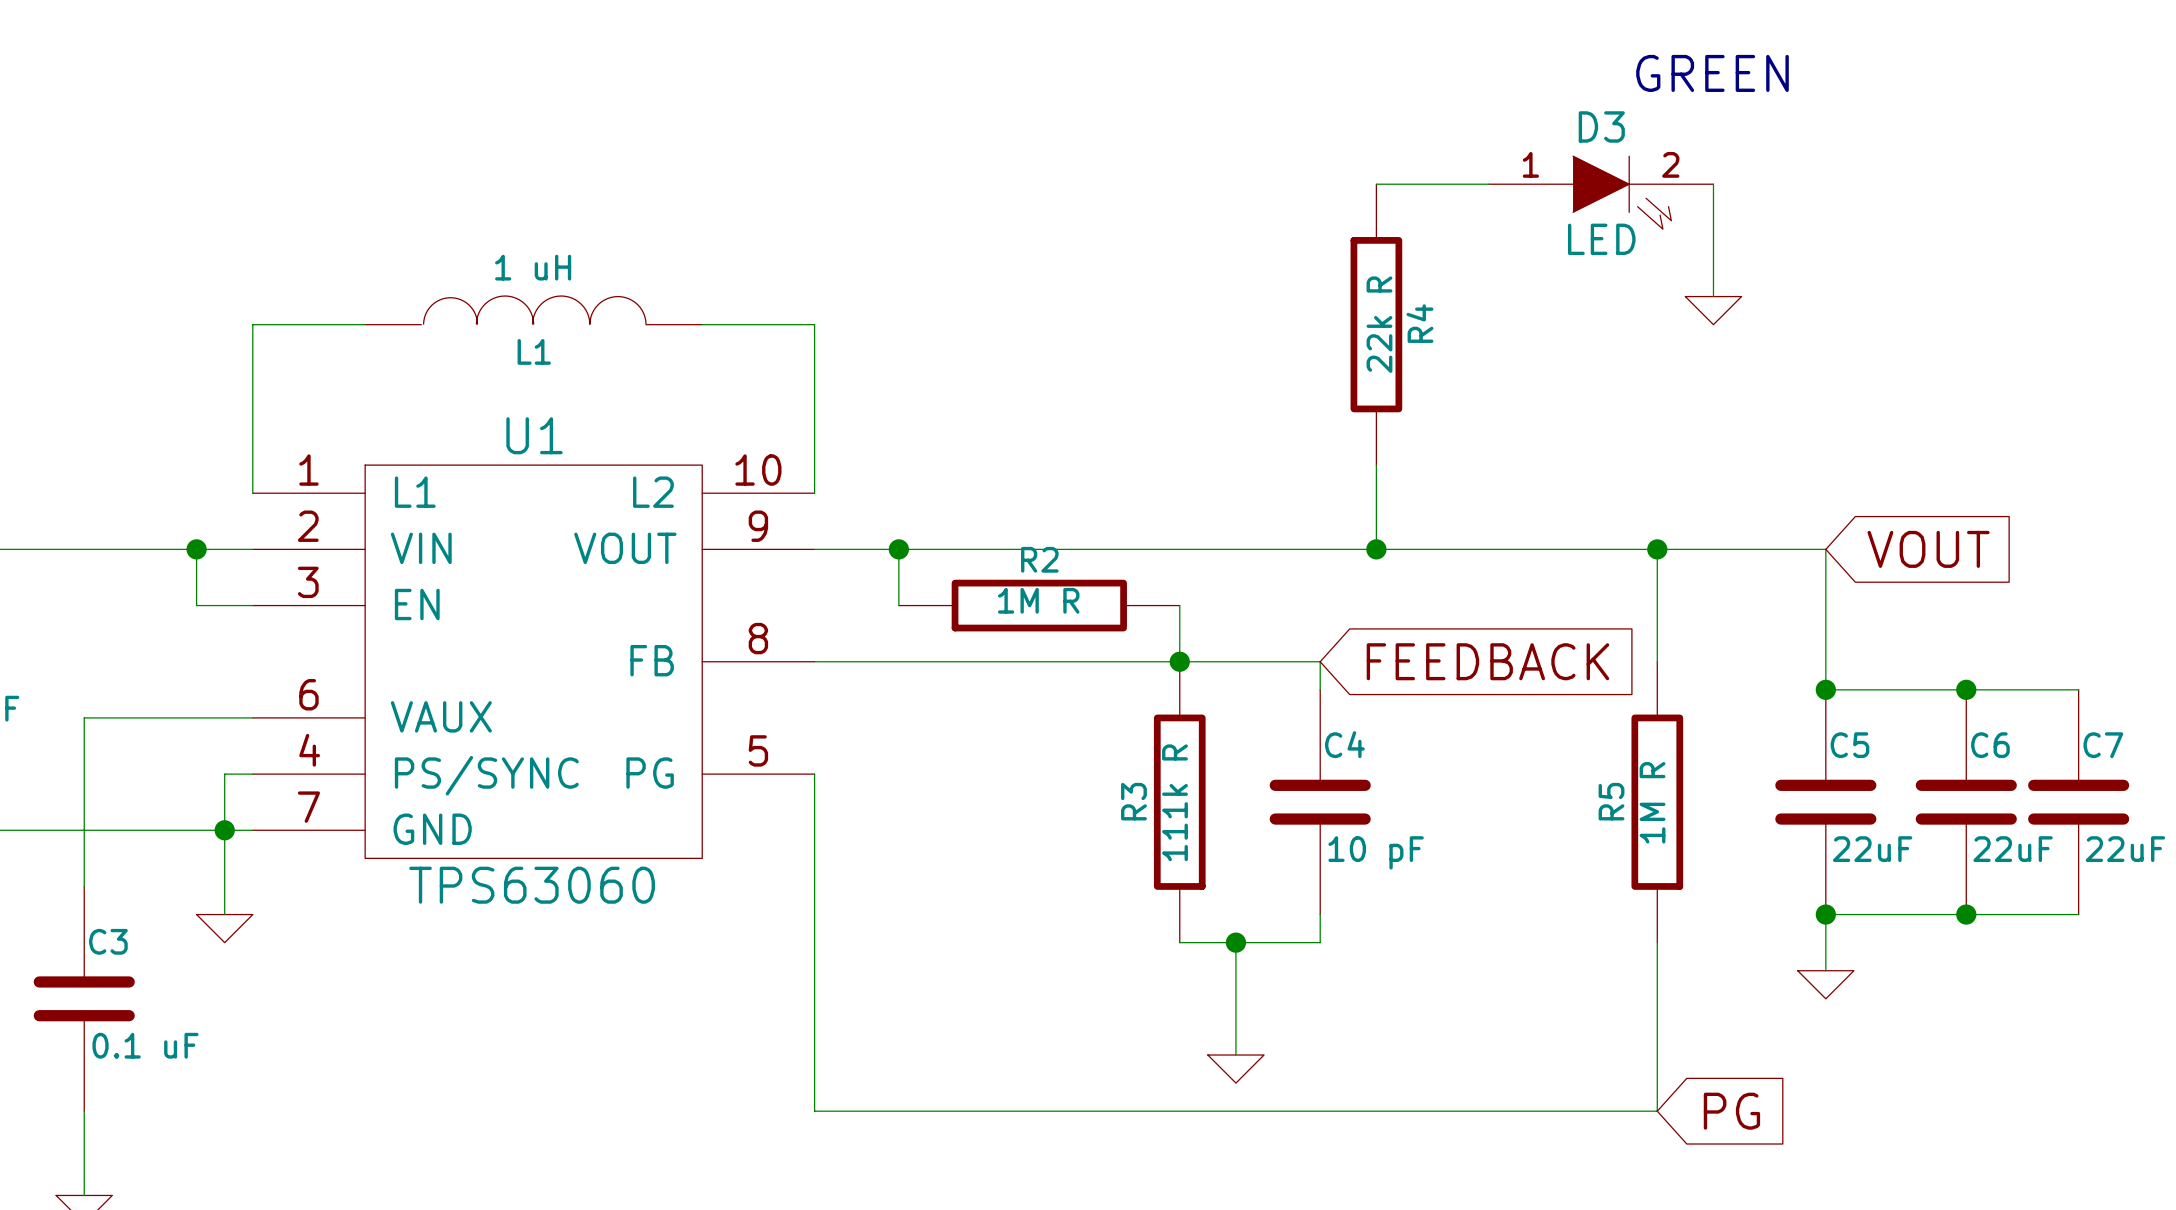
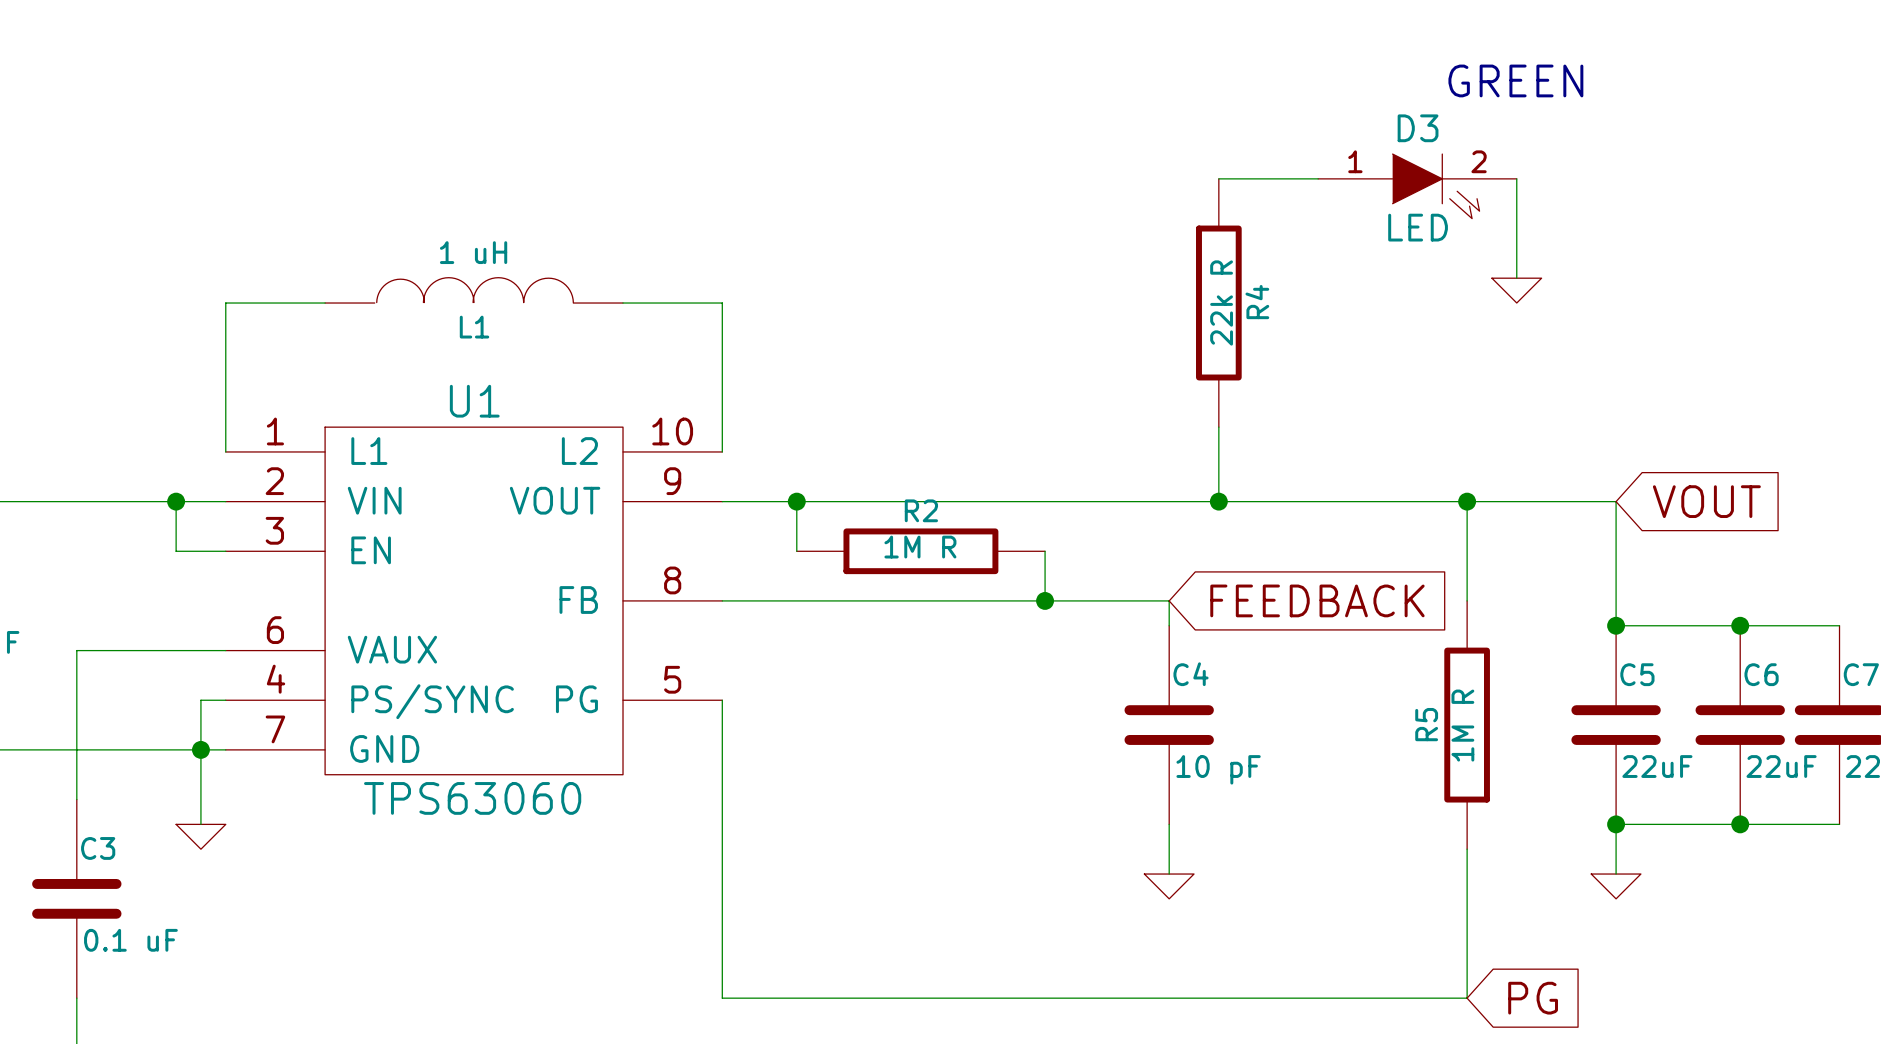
R3: 111k R (1179, 802) -> none
wire: (1179, 942) (1320, 942) -> (1169, 874) (1169, 849)
wire: (1235, 942) (1235, 1055) -> none
junction: (1235, 942) -> none
power symbol position: (1235, 1069) -> (1169, 886)

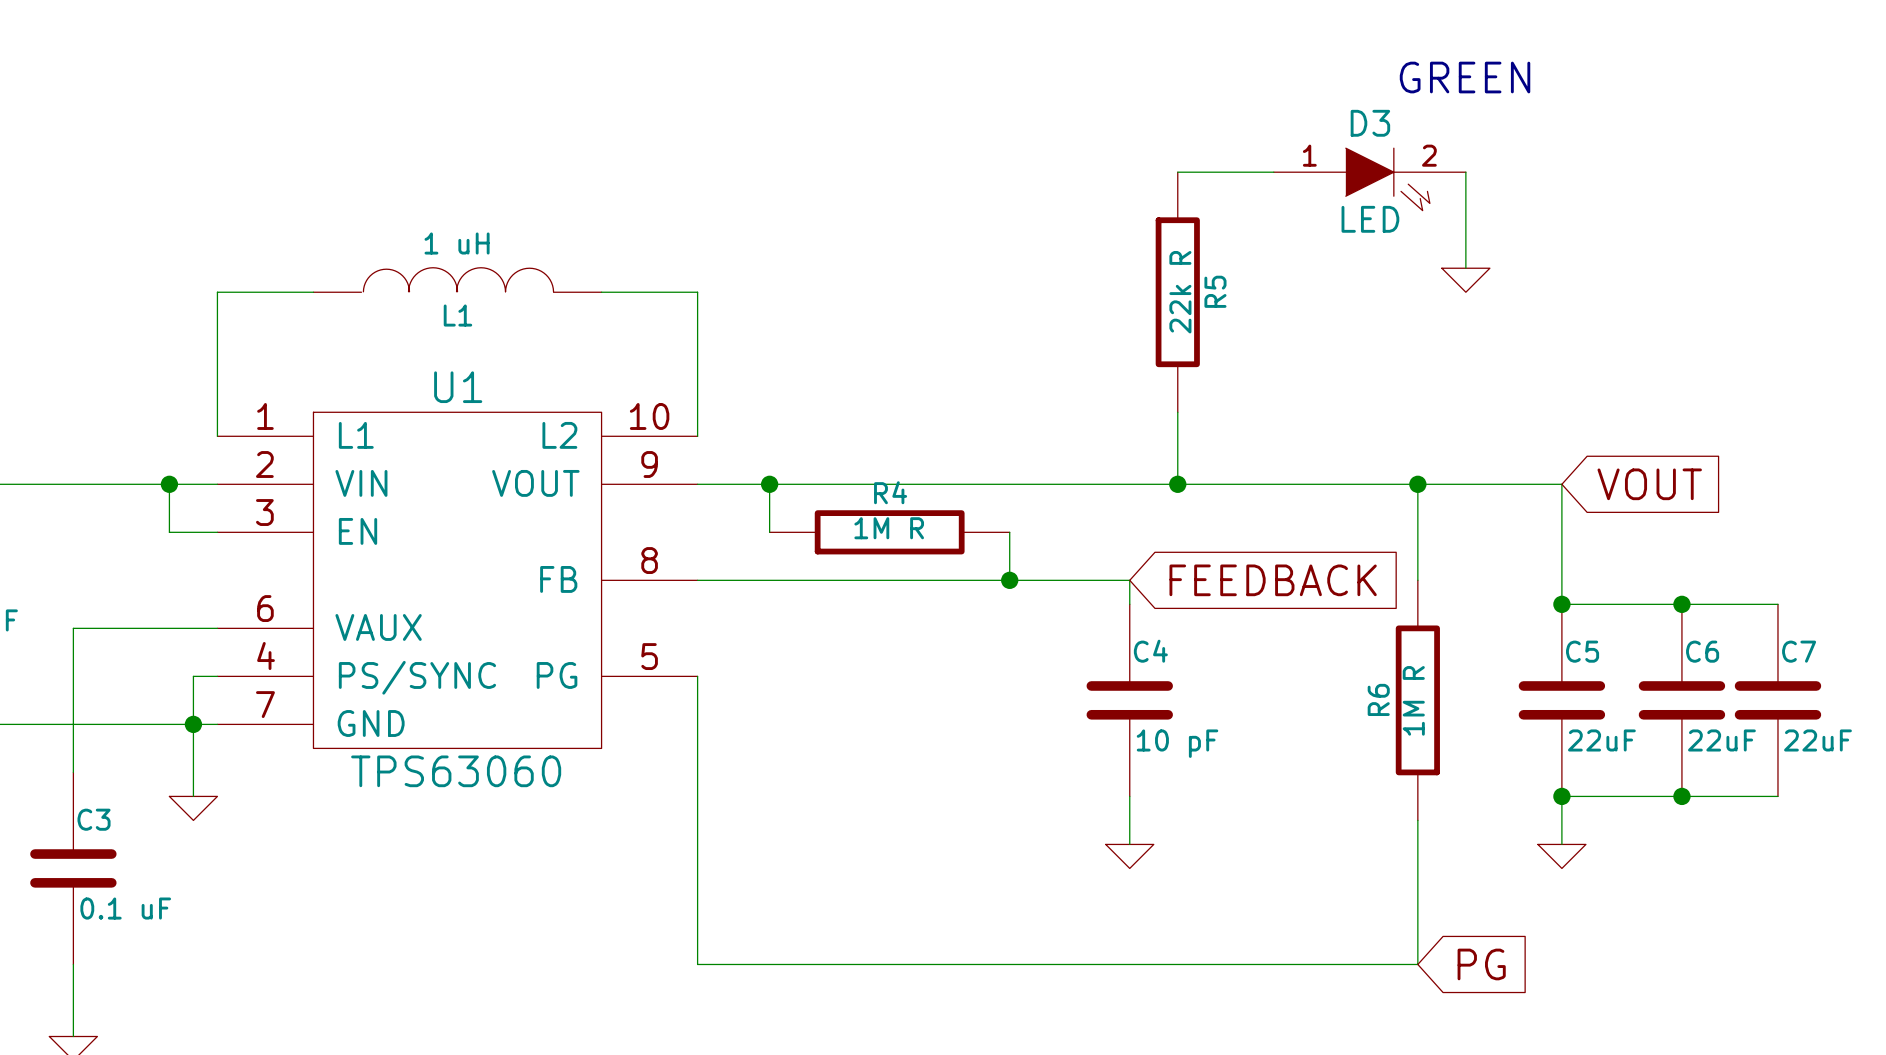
R4 name: R4 (1257, 302) -> R5 (1215, 291)
R2 name: R2 (921, 510) -> R4 (890, 492)
R5 name: R5 (1426, 724) -> R6 (1378, 699)

